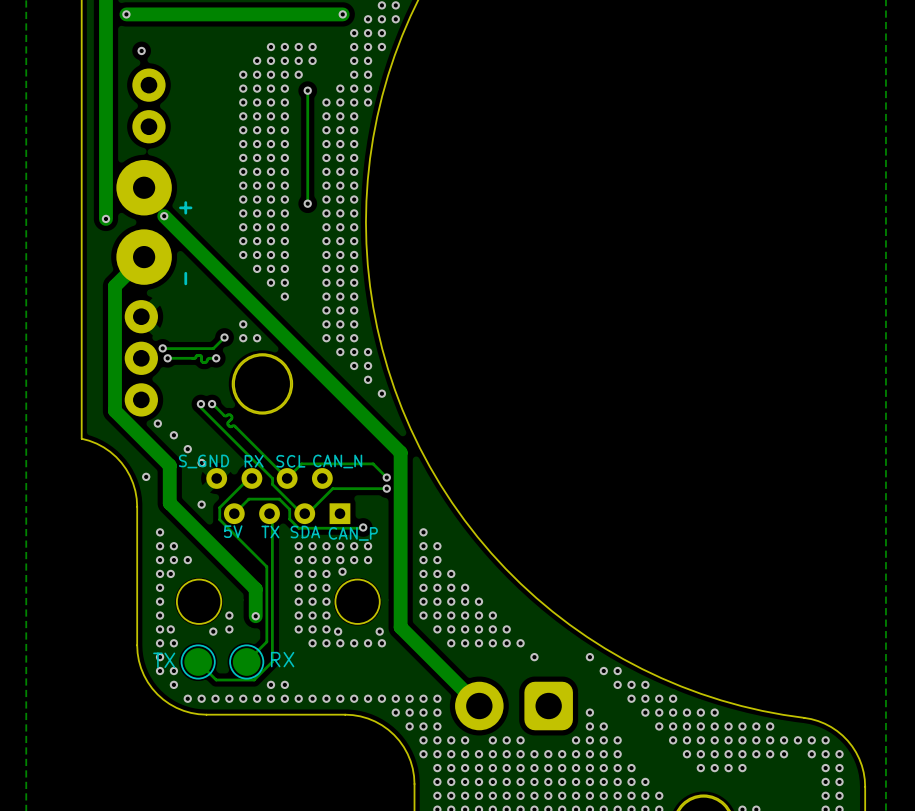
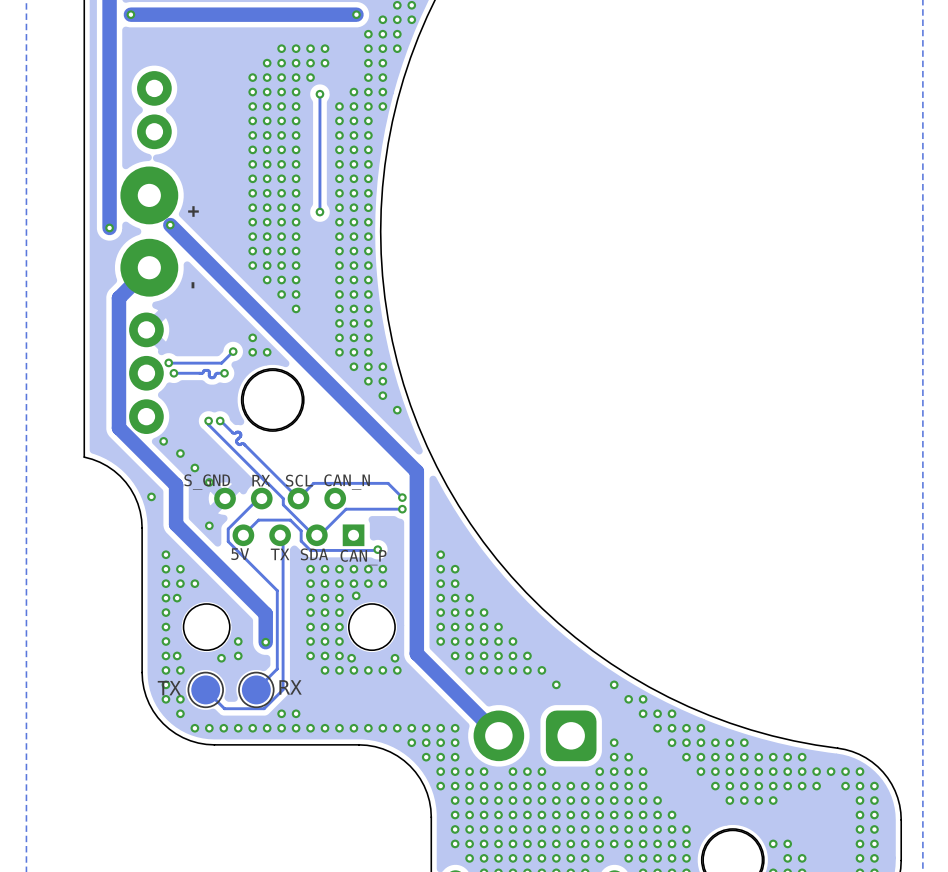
via: (141, 50) -> none

